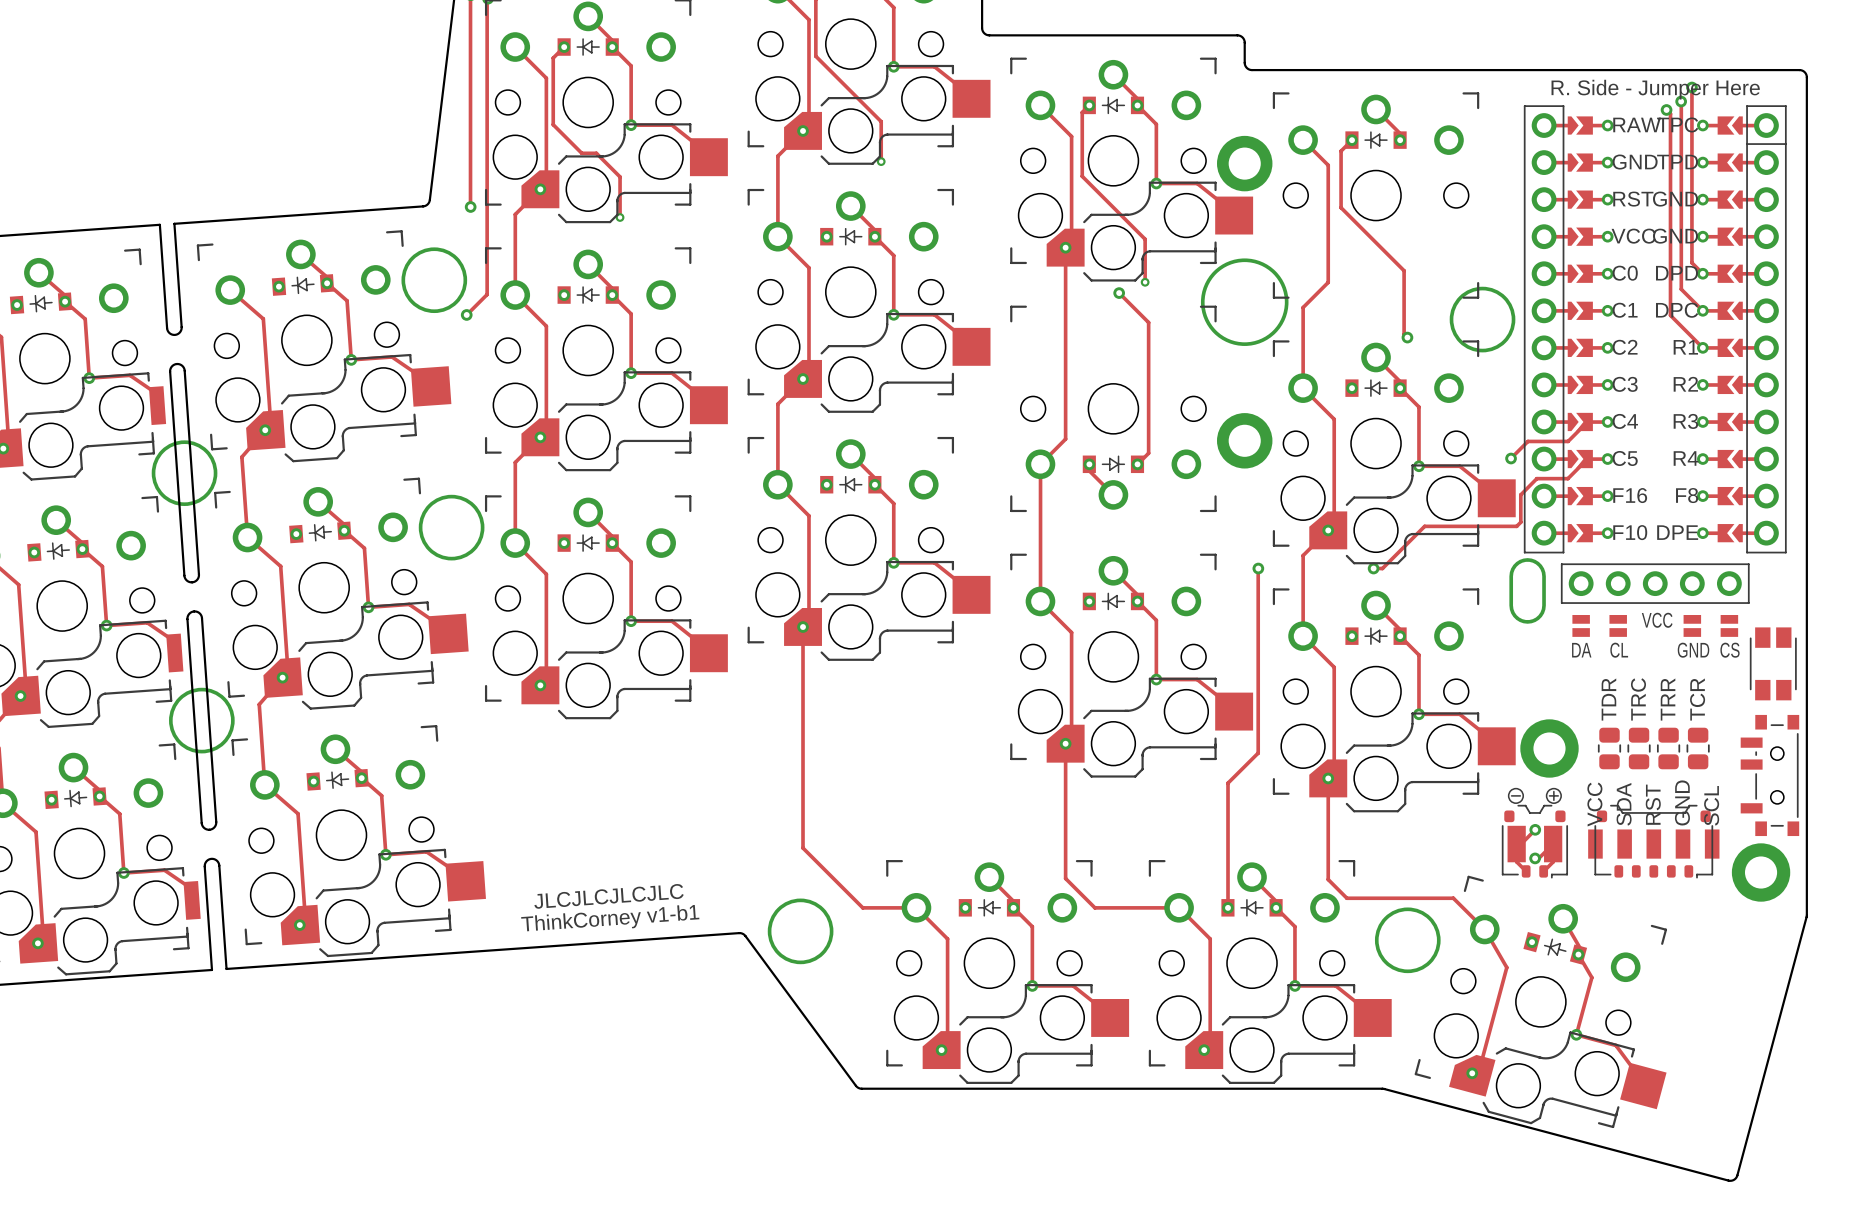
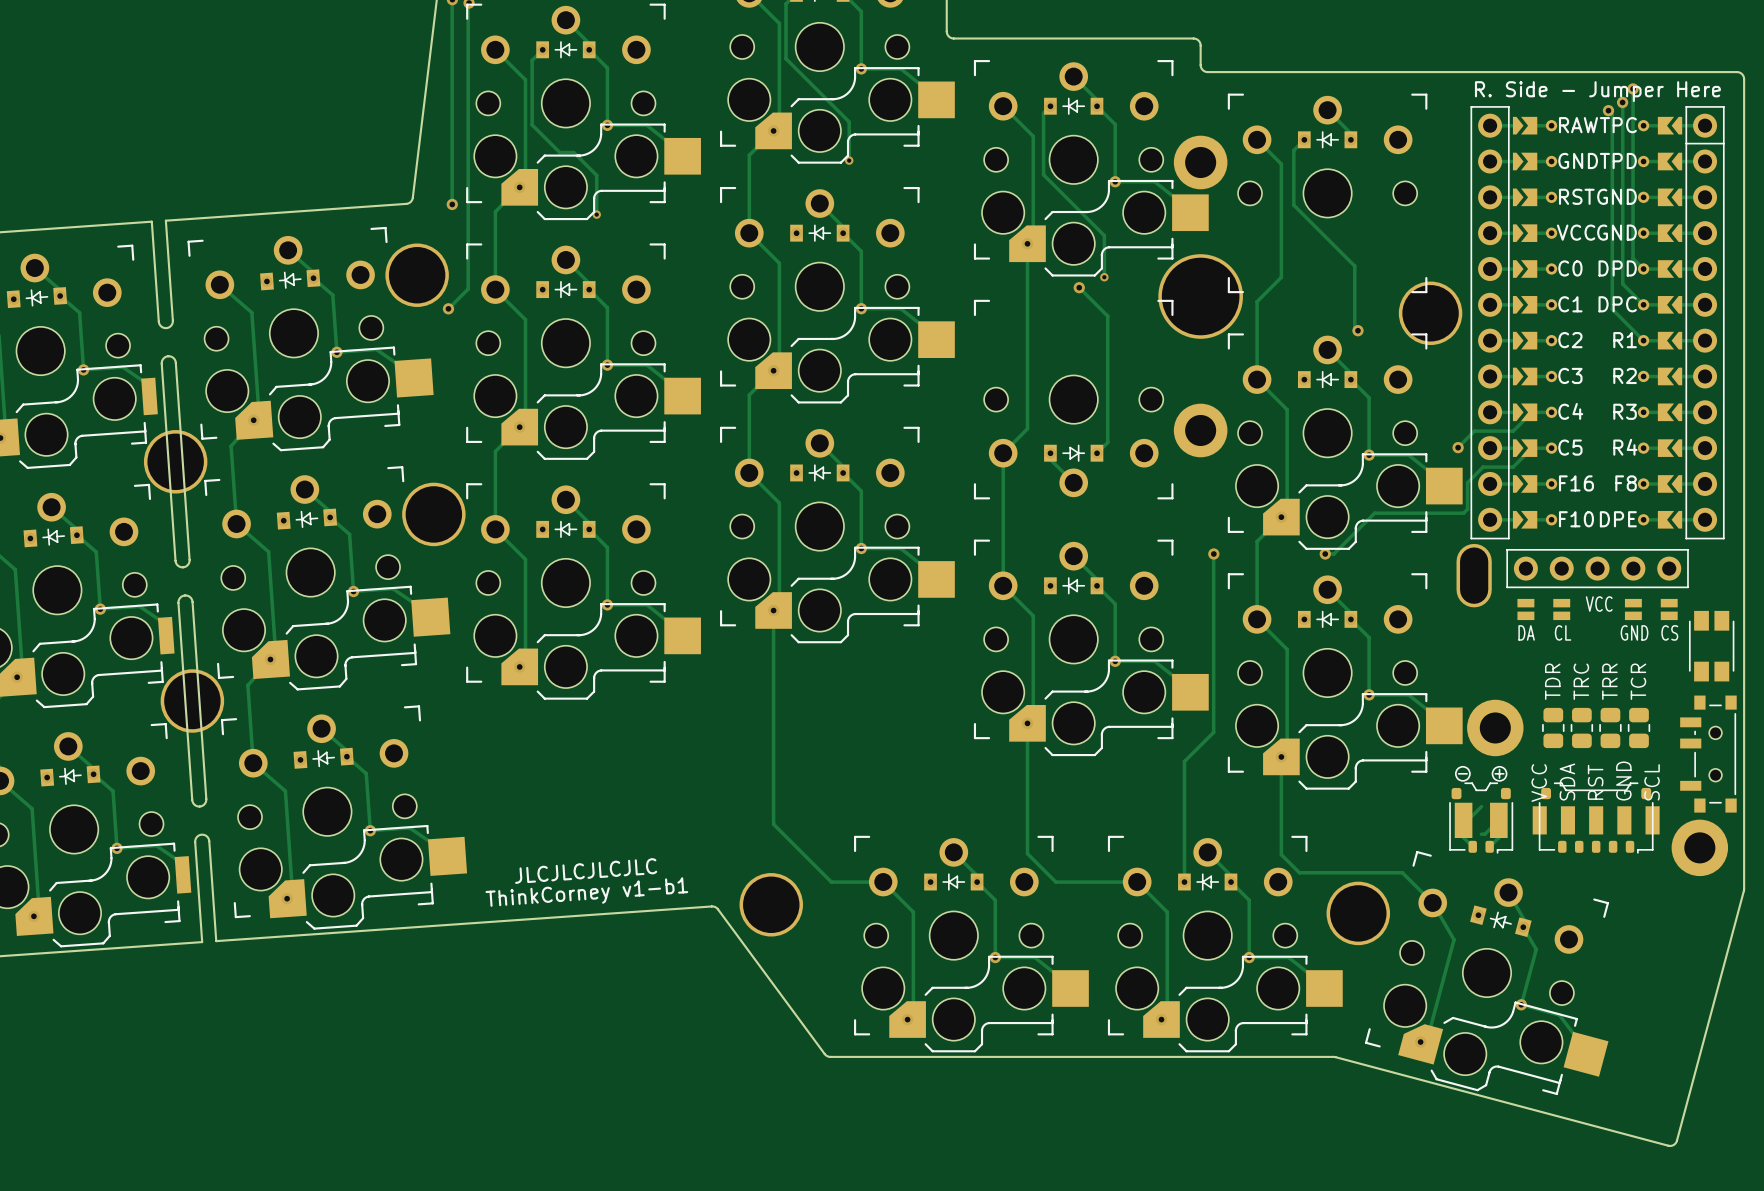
via: (1535, 829) -> none
via: (1535, 858) -> none

